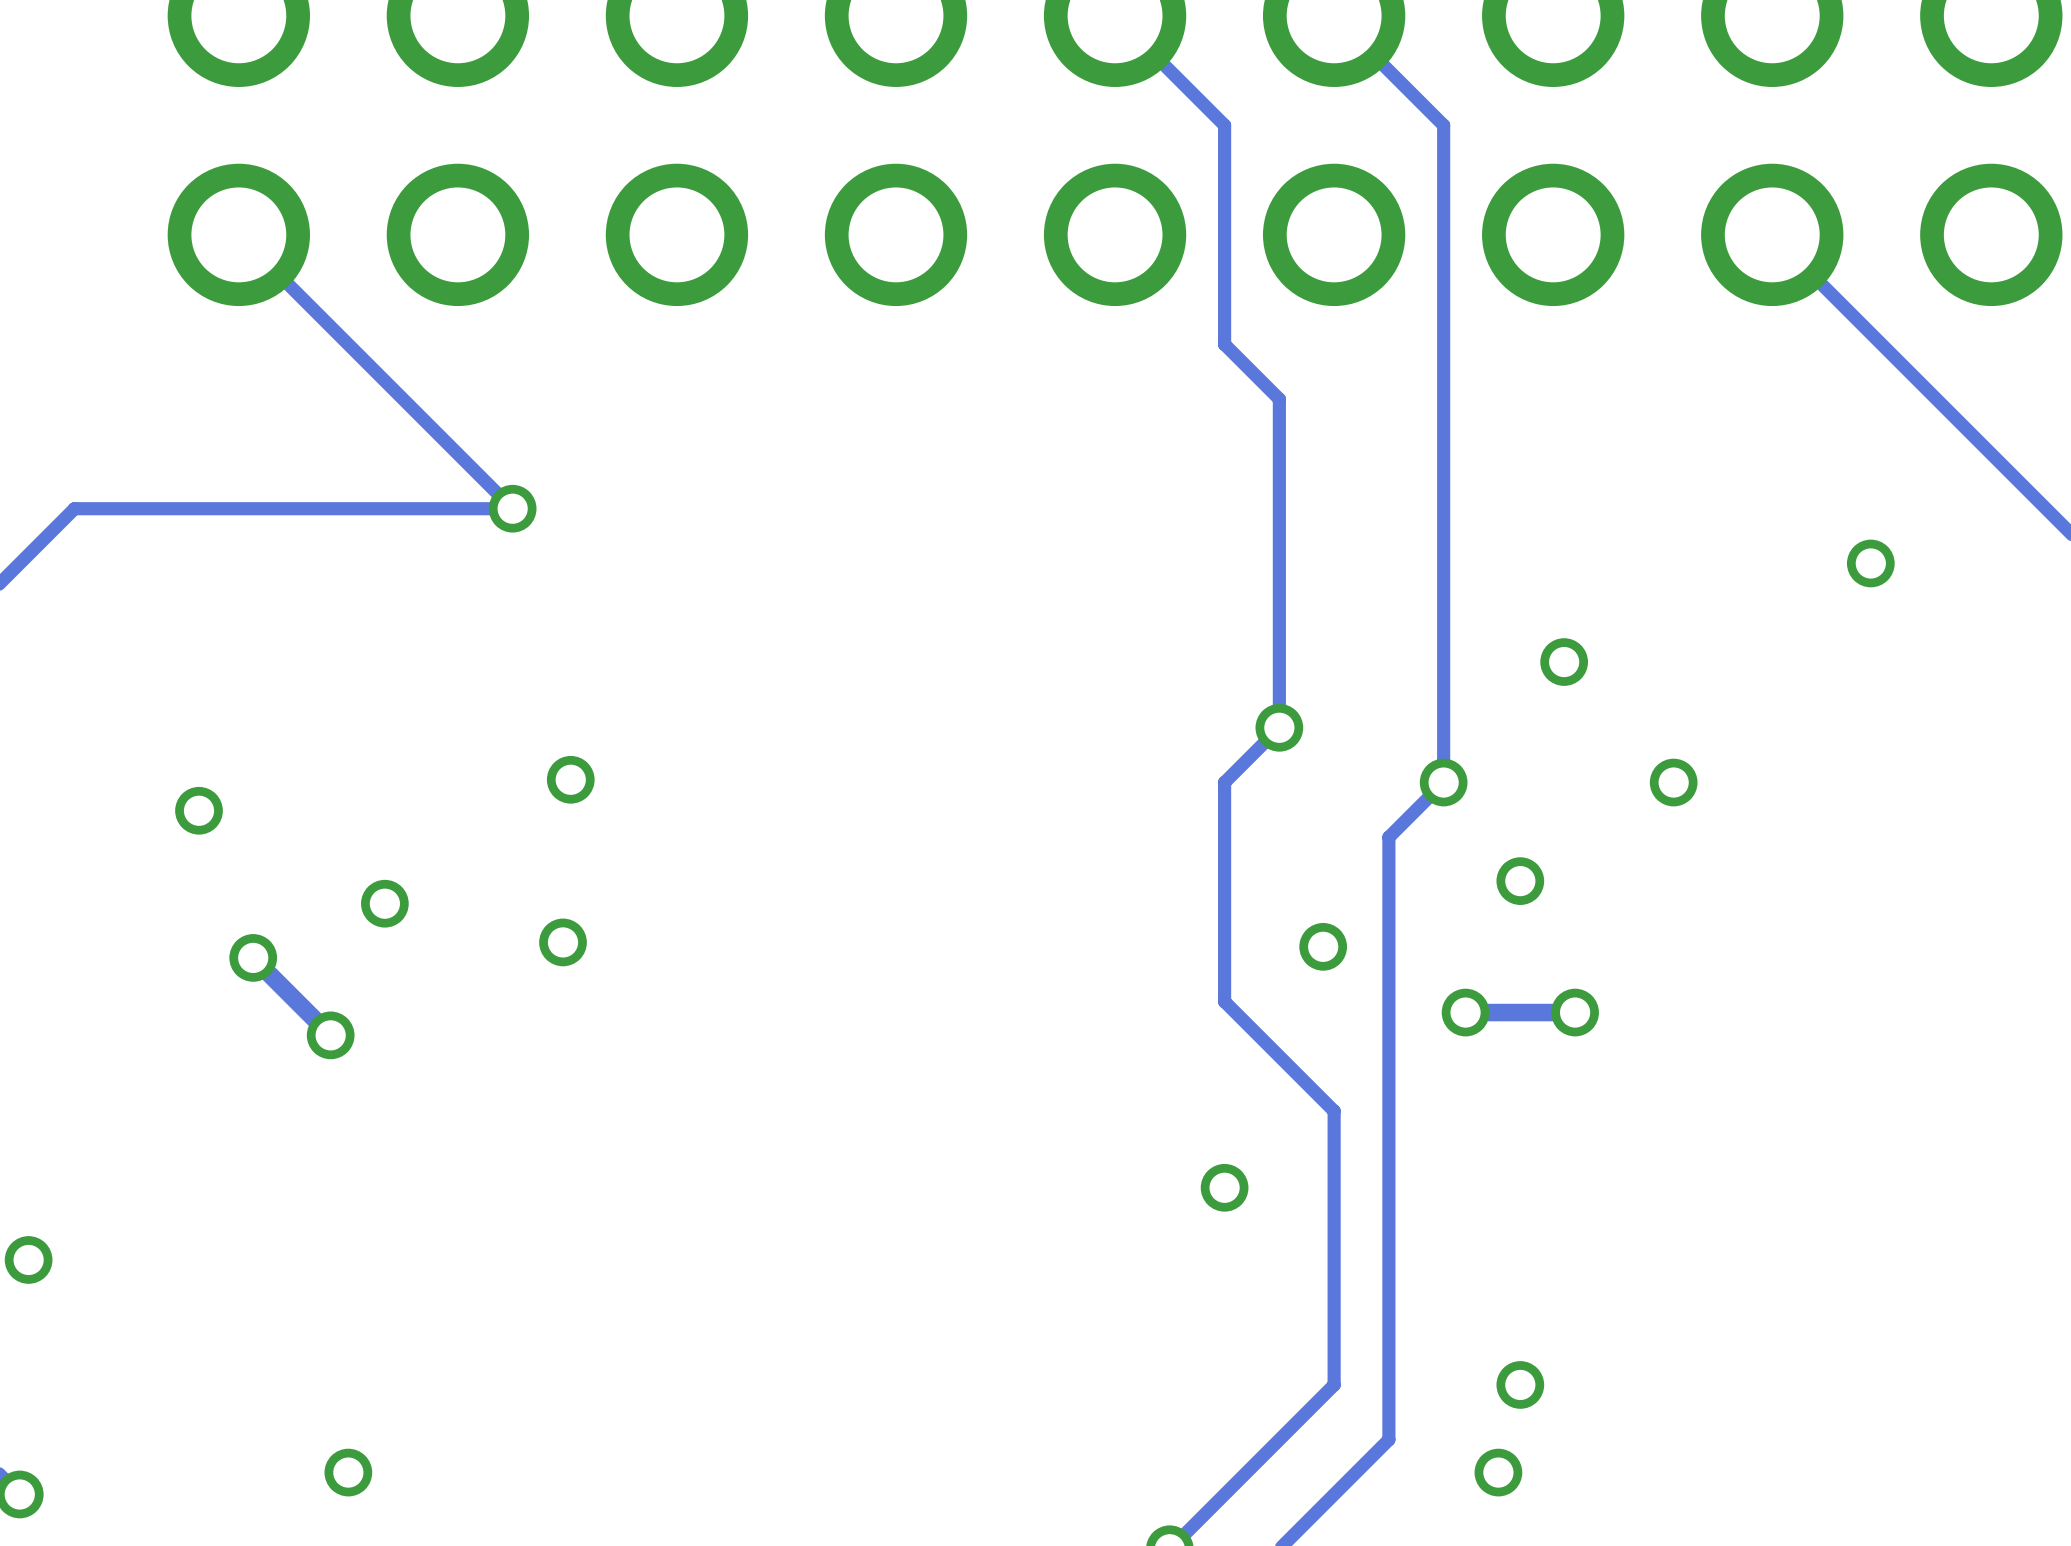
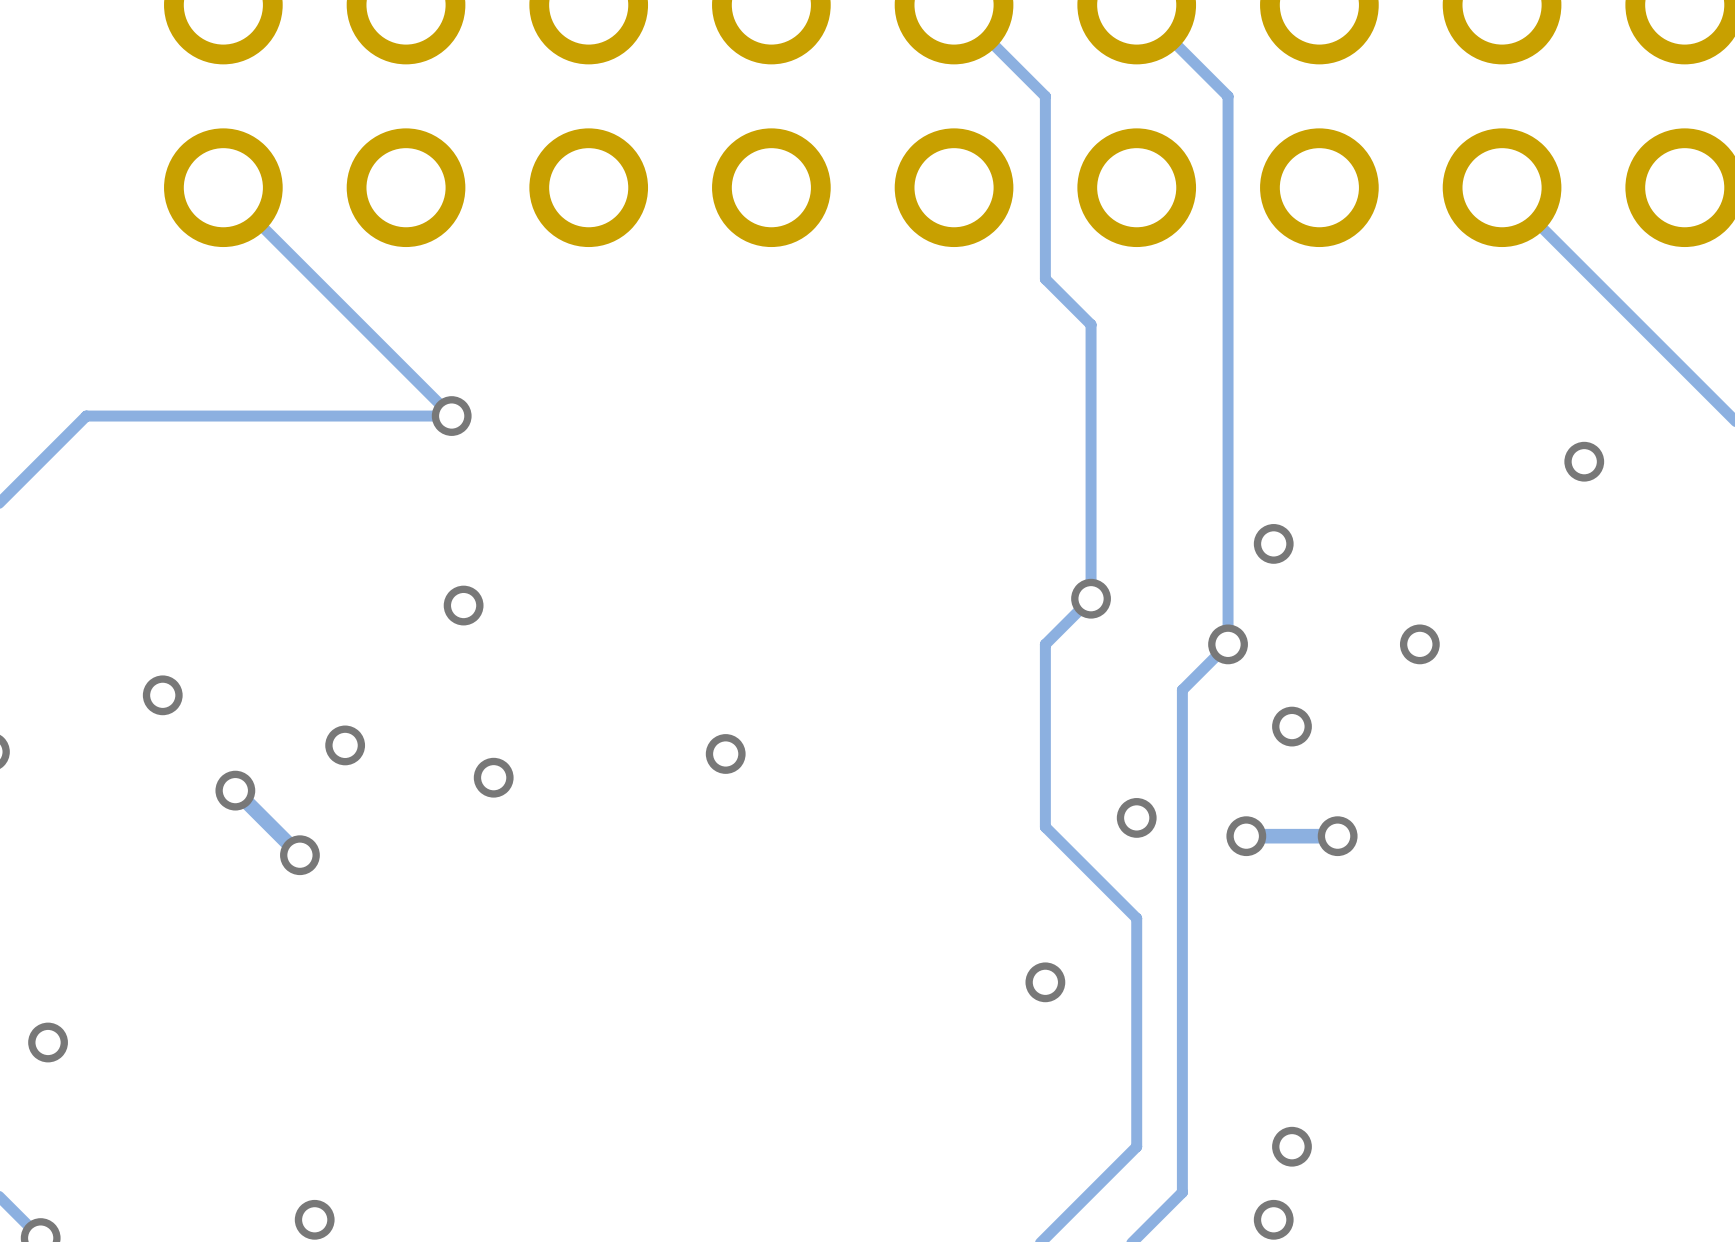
via position: (1564, 662) -> (1273, 543)
via position: (570, 779) -> (463, 605)
via position: (199, 810) -> (162, 695)
via: none -> (725, 753)
via position: (1323, 946) -> (1136, 817)

